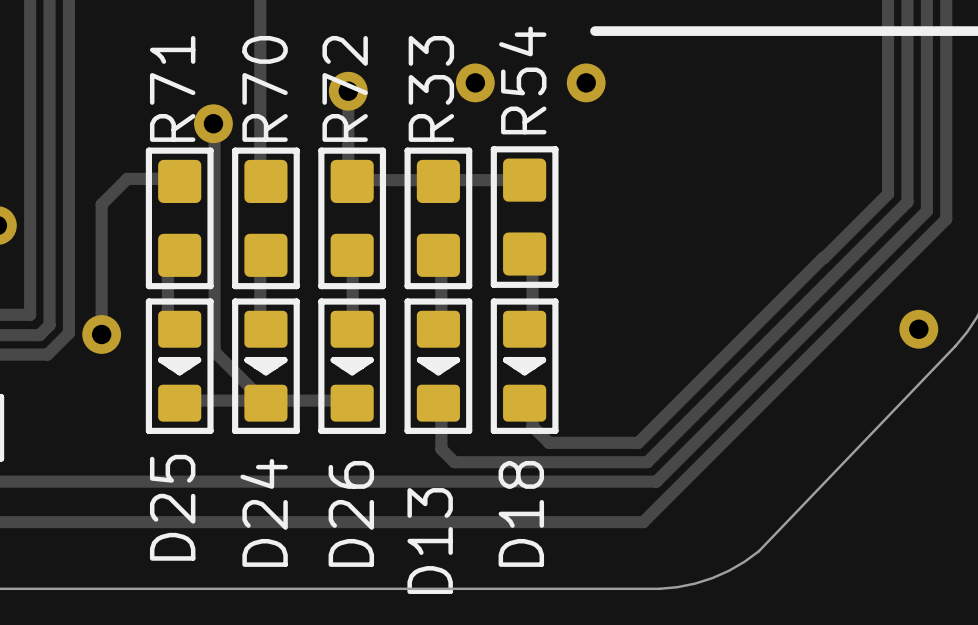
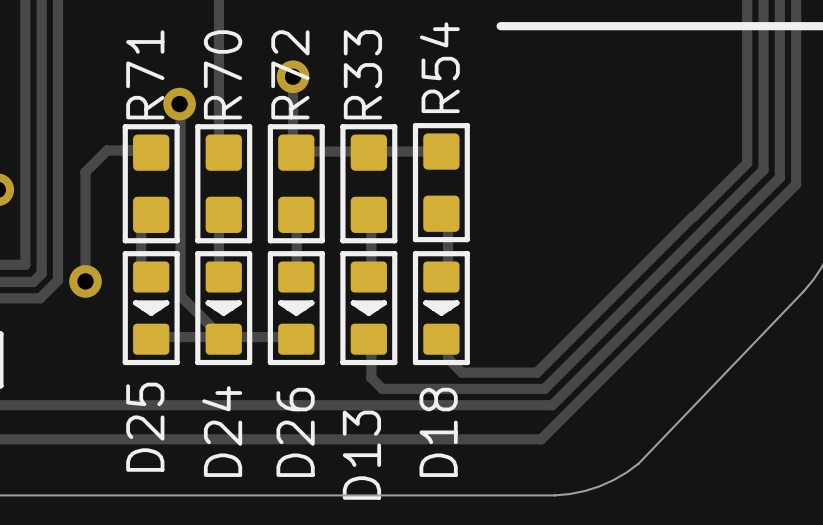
via: (475, 82) -> none
via: (586, 82) -> none
via: (918, 329) -> none

